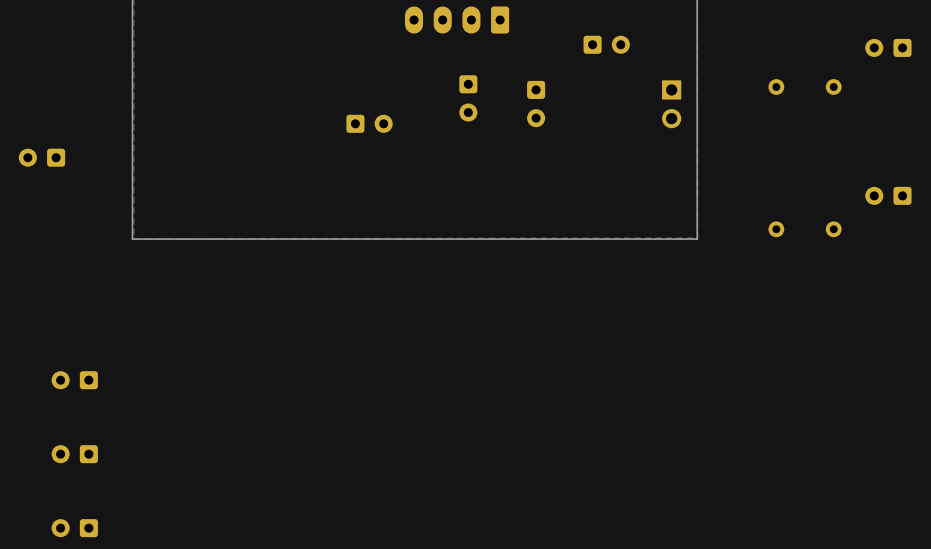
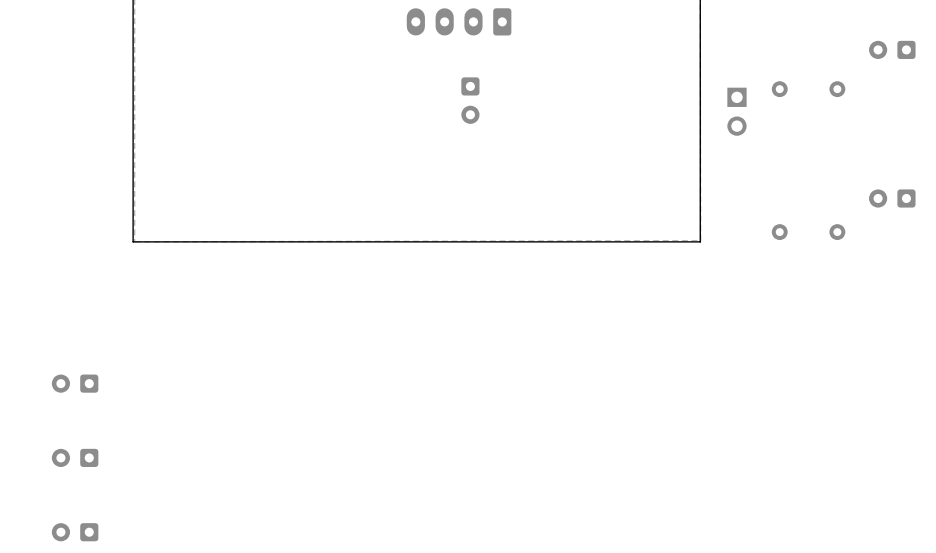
part: (606, 44) -> none
part: (536, 104) -> none
part position: (671, 104) -> (736, 111)
part: (369, 123) -> none
part: (41, 157) -> none

